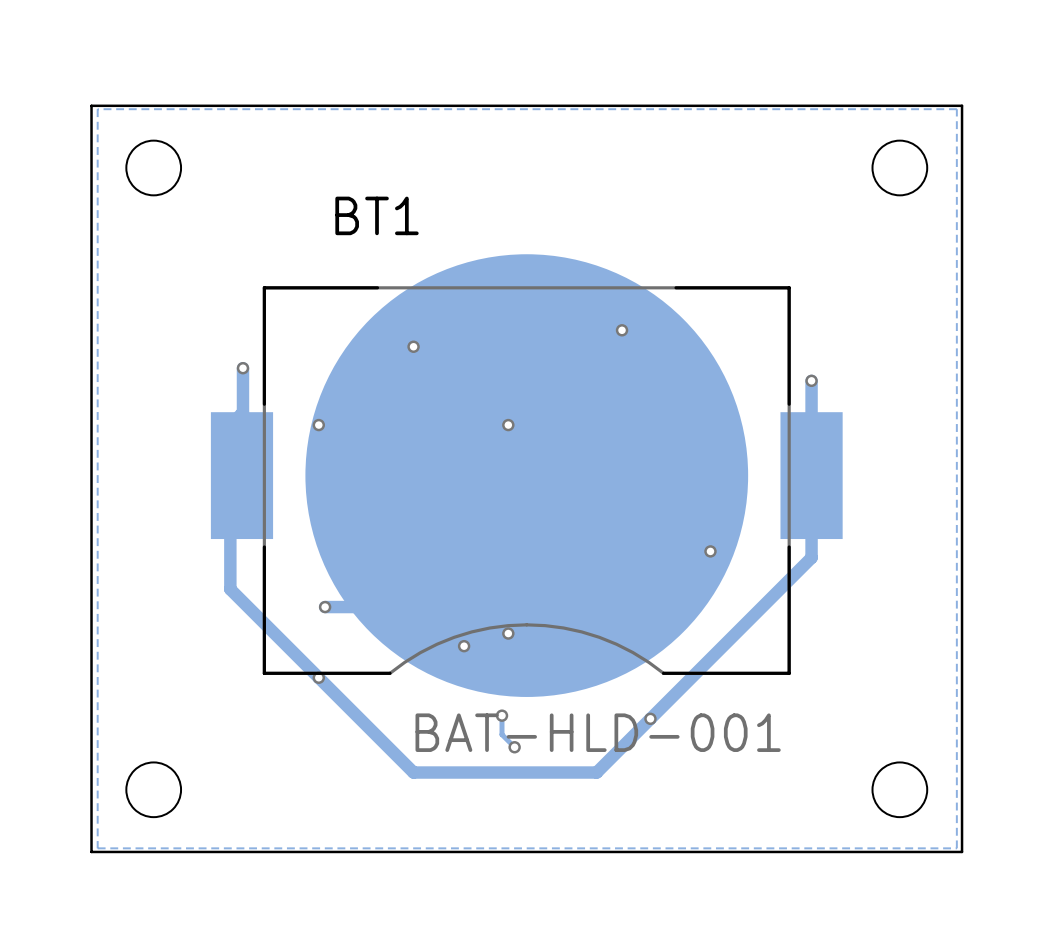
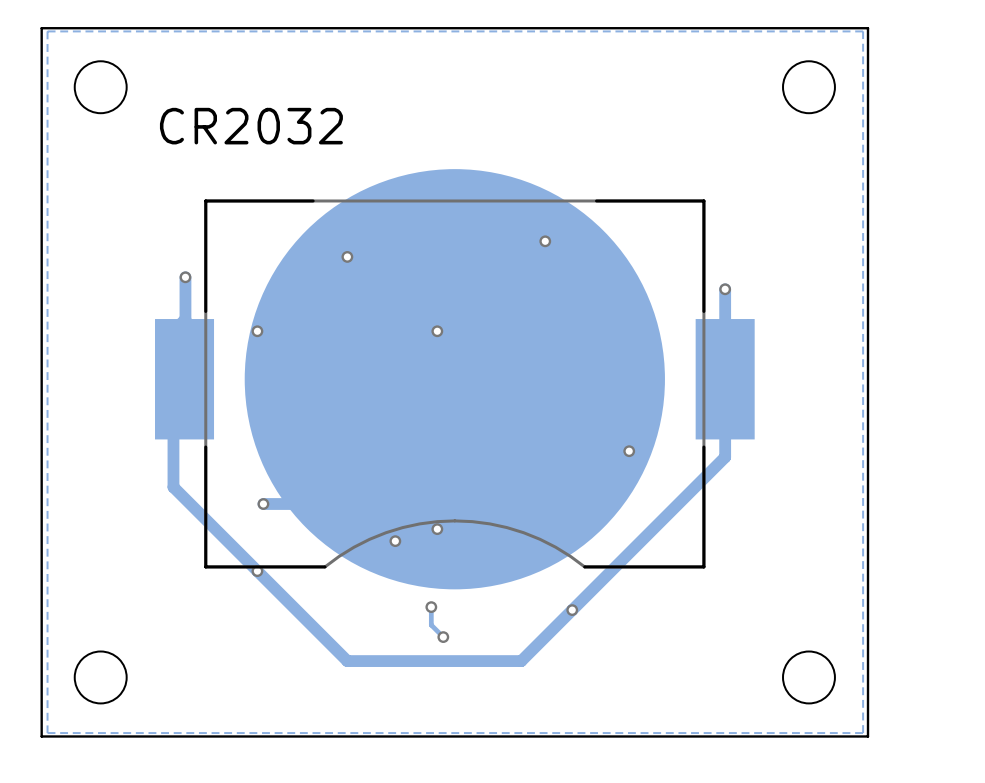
BT1 name: BT1 (377, 215) -> none
BT1 value: BAT-HLD-001 (598, 732) -> CR2032 (251, 126)

